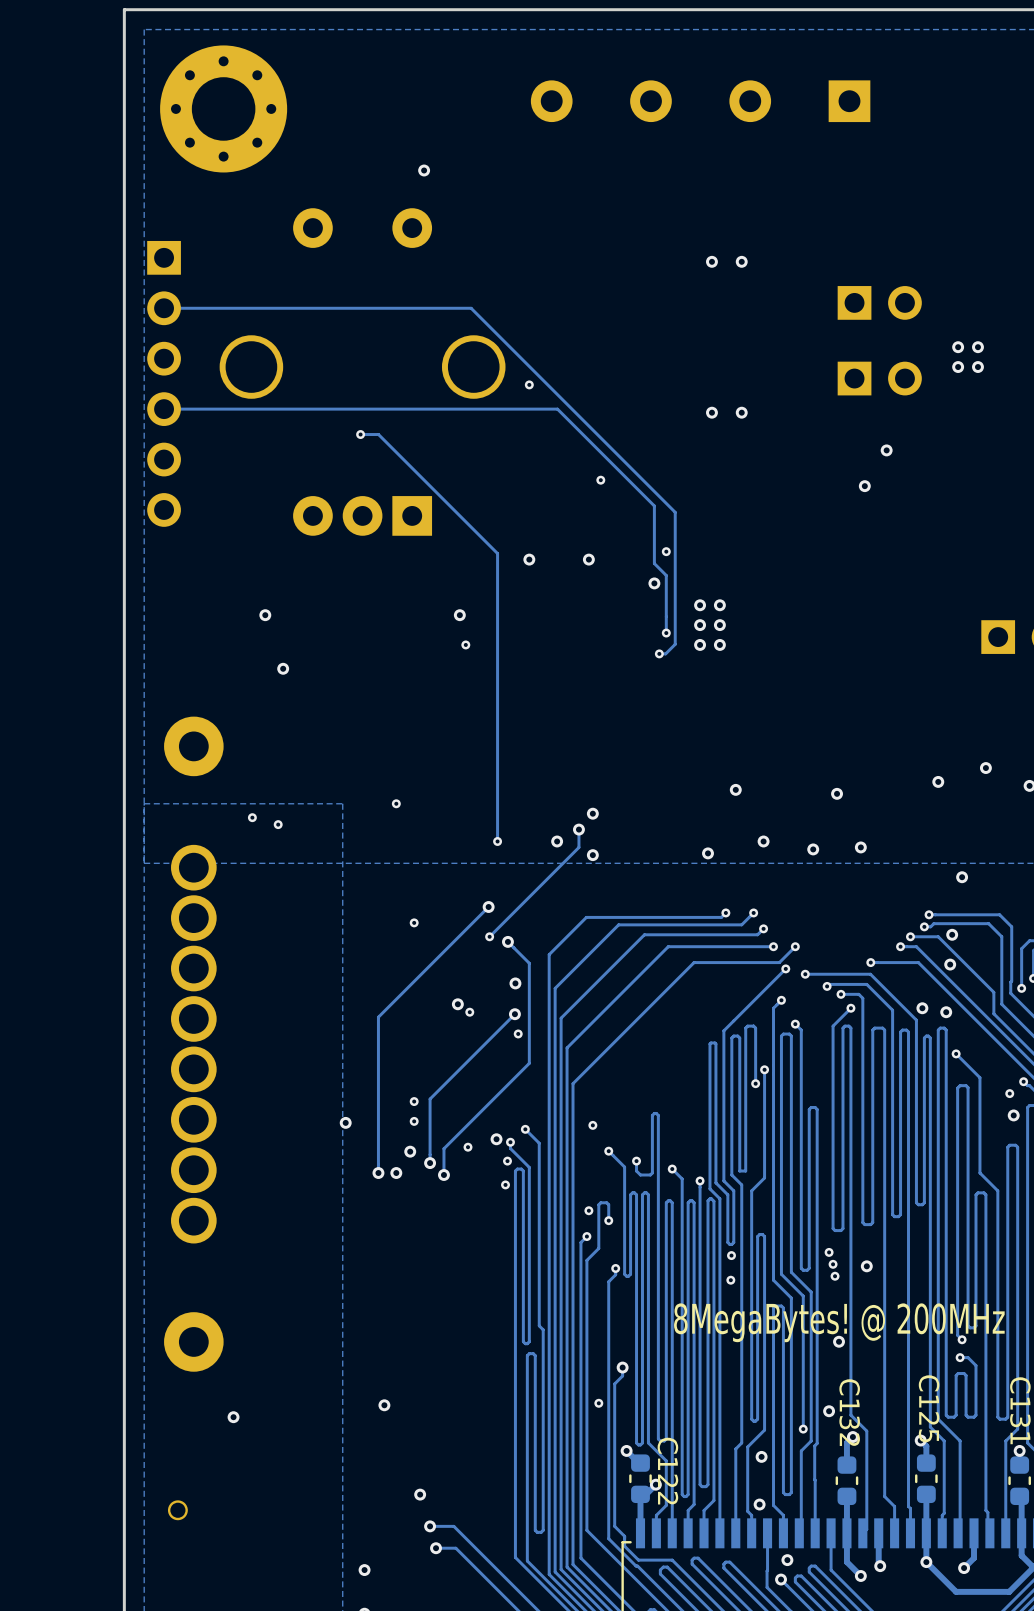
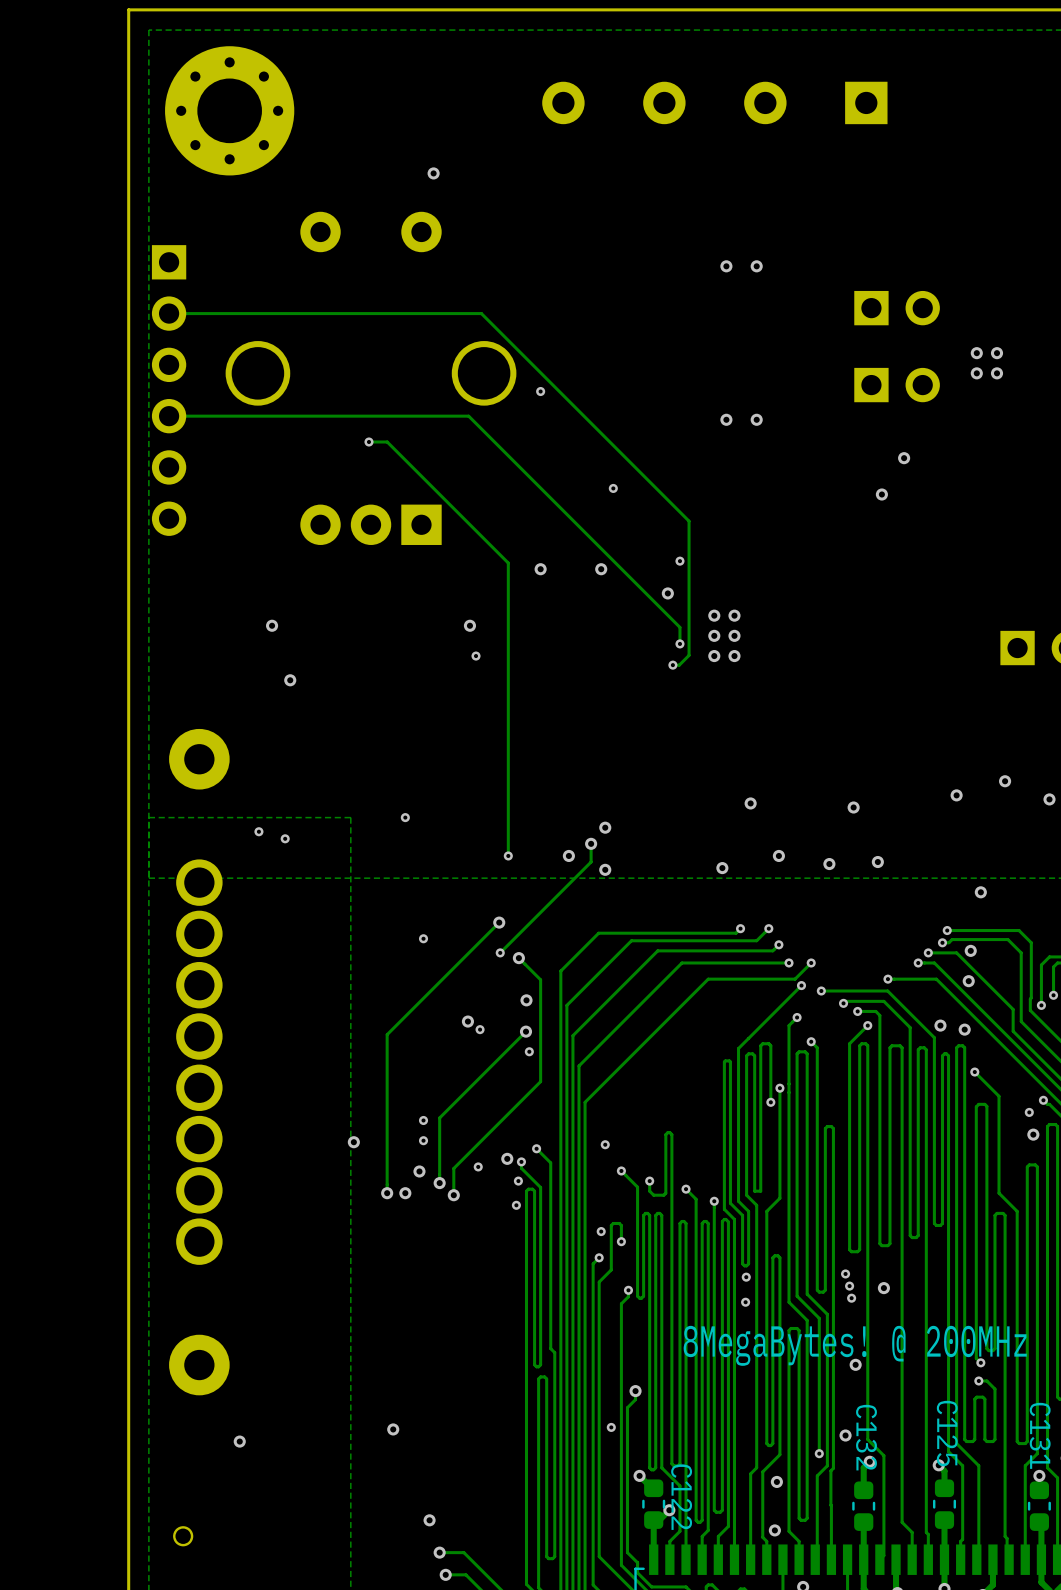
track: (458, 409) (557, 409) (654, 505) (654, 563) (666, 575) (666, 616) -> (468, 416) (679, 627)

